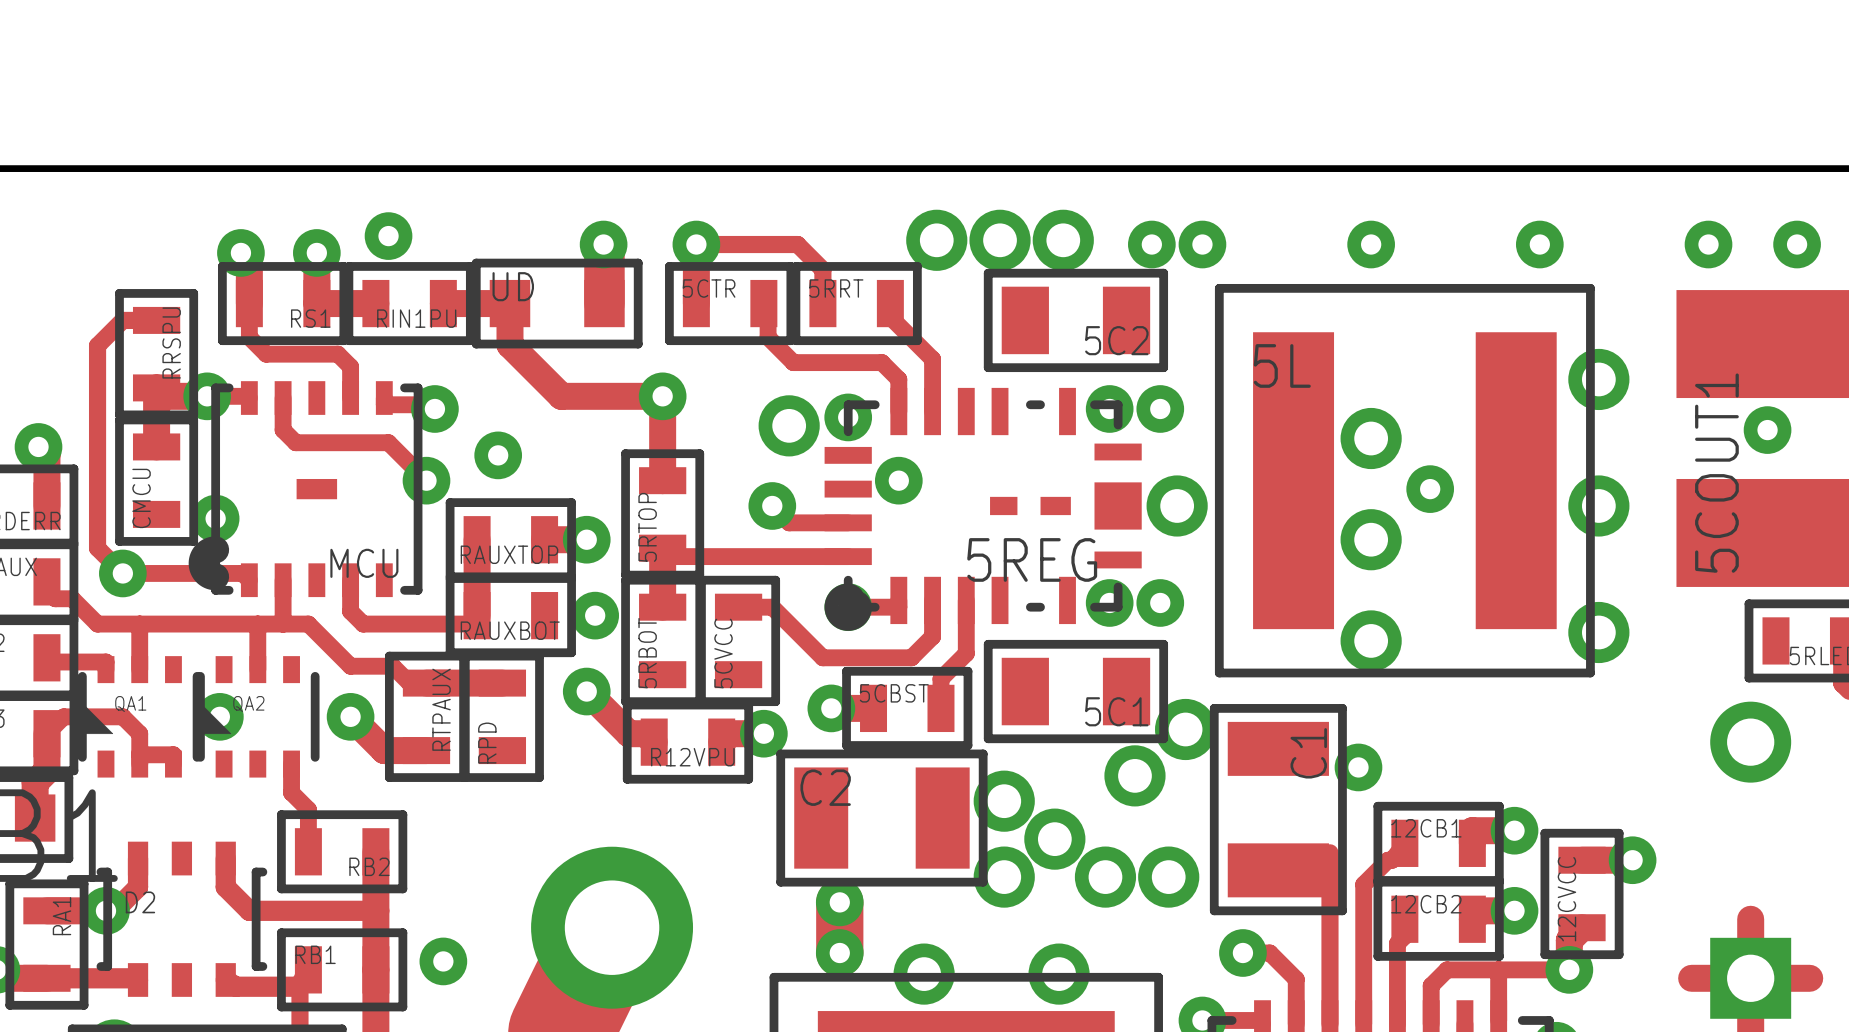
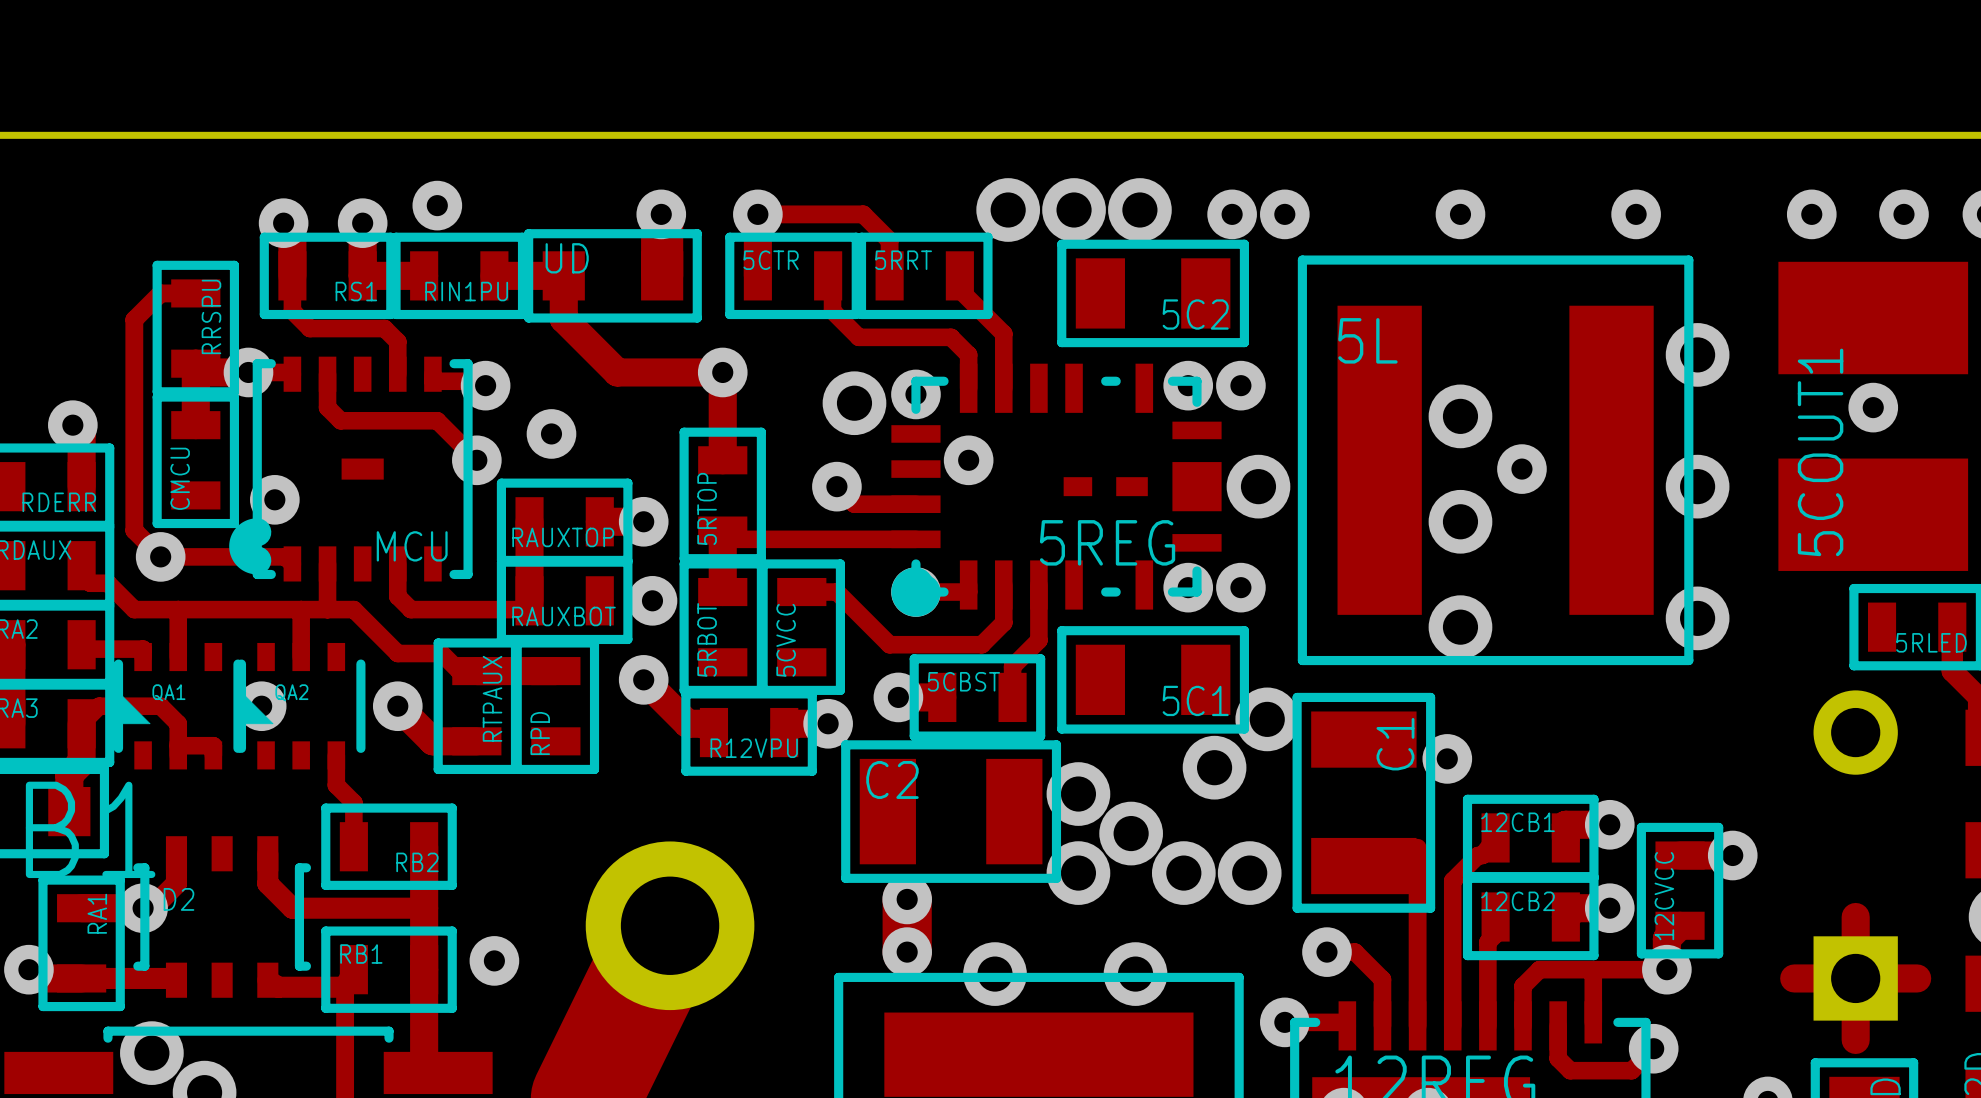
via position: (215, 518) -> (274, 499)

